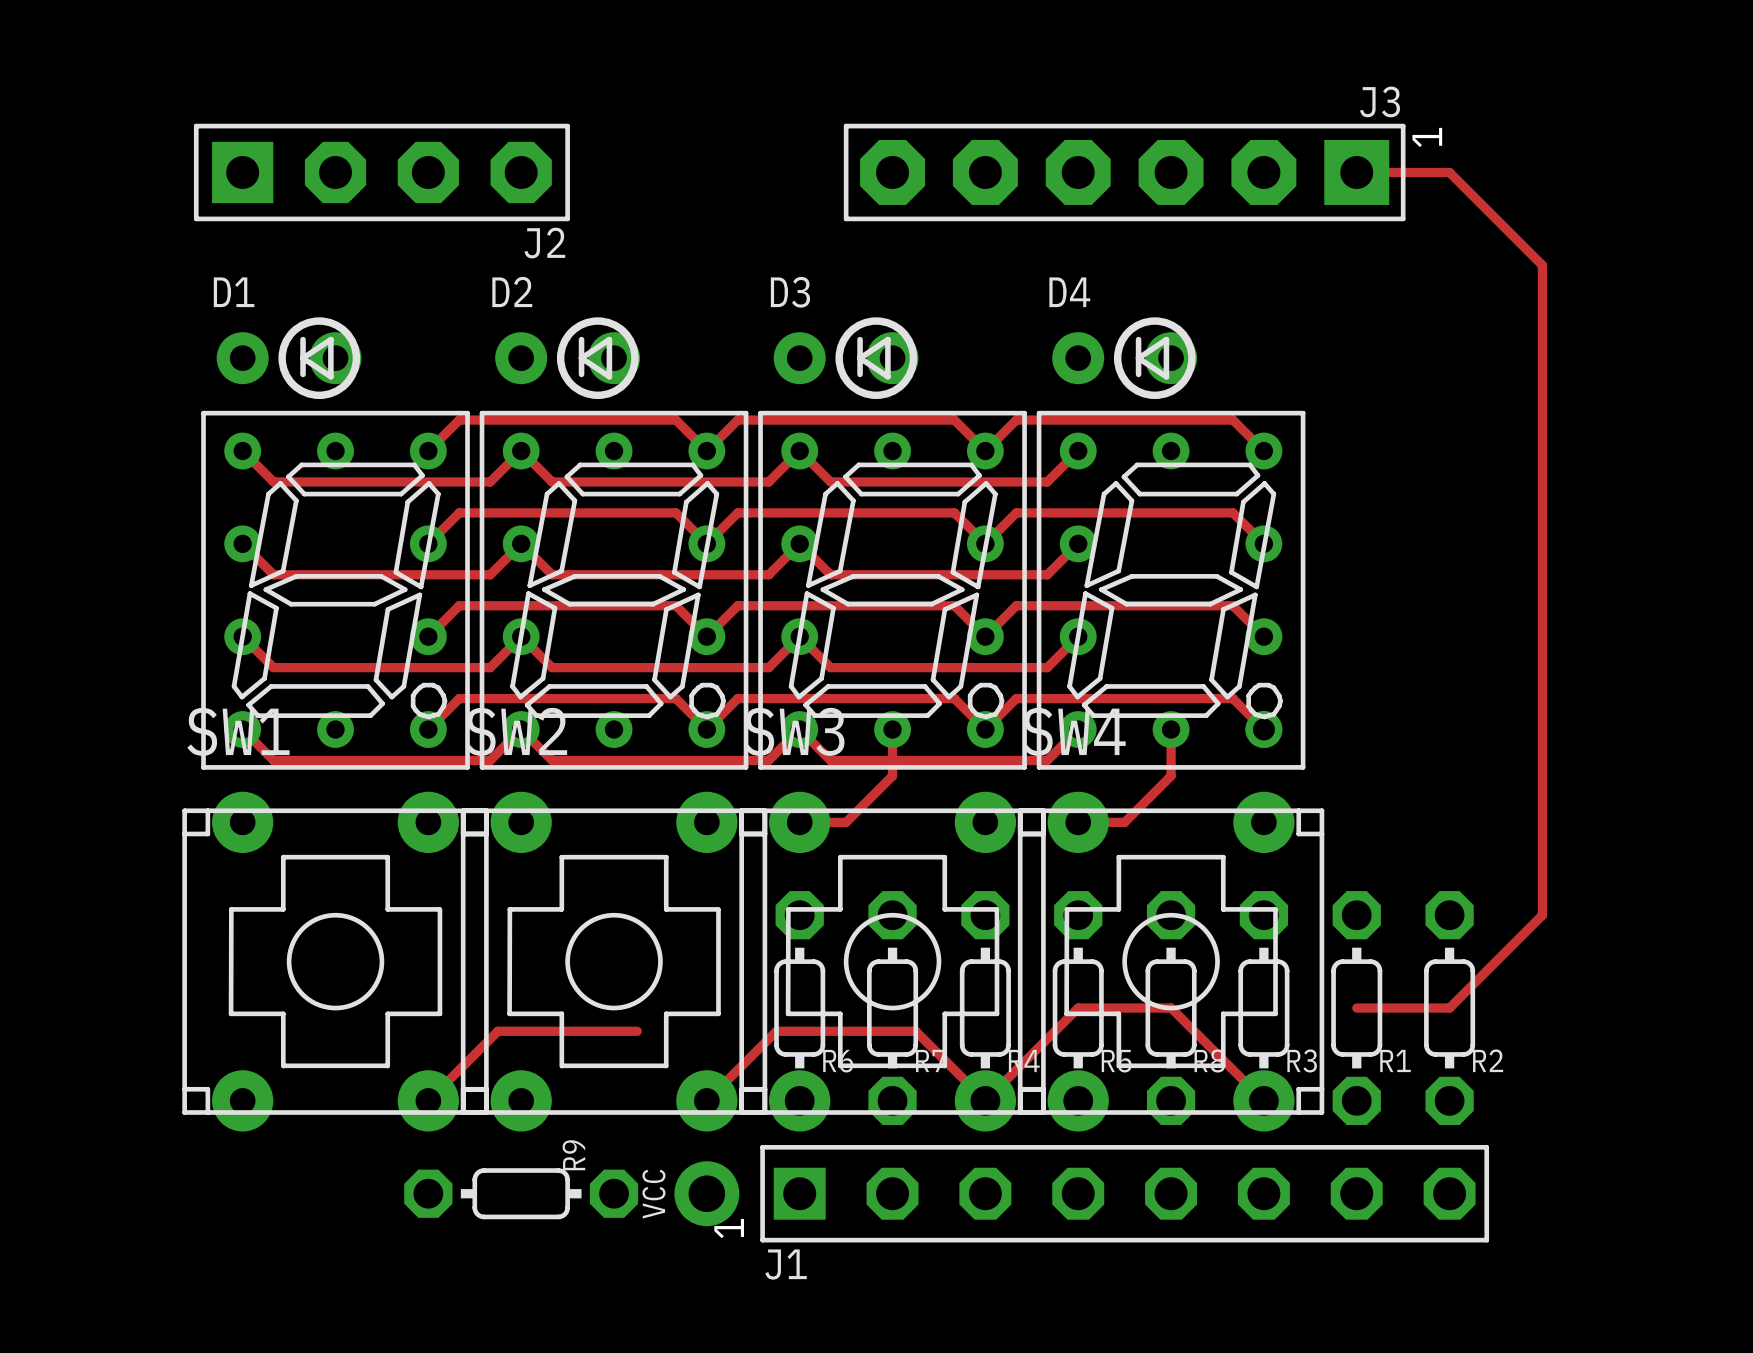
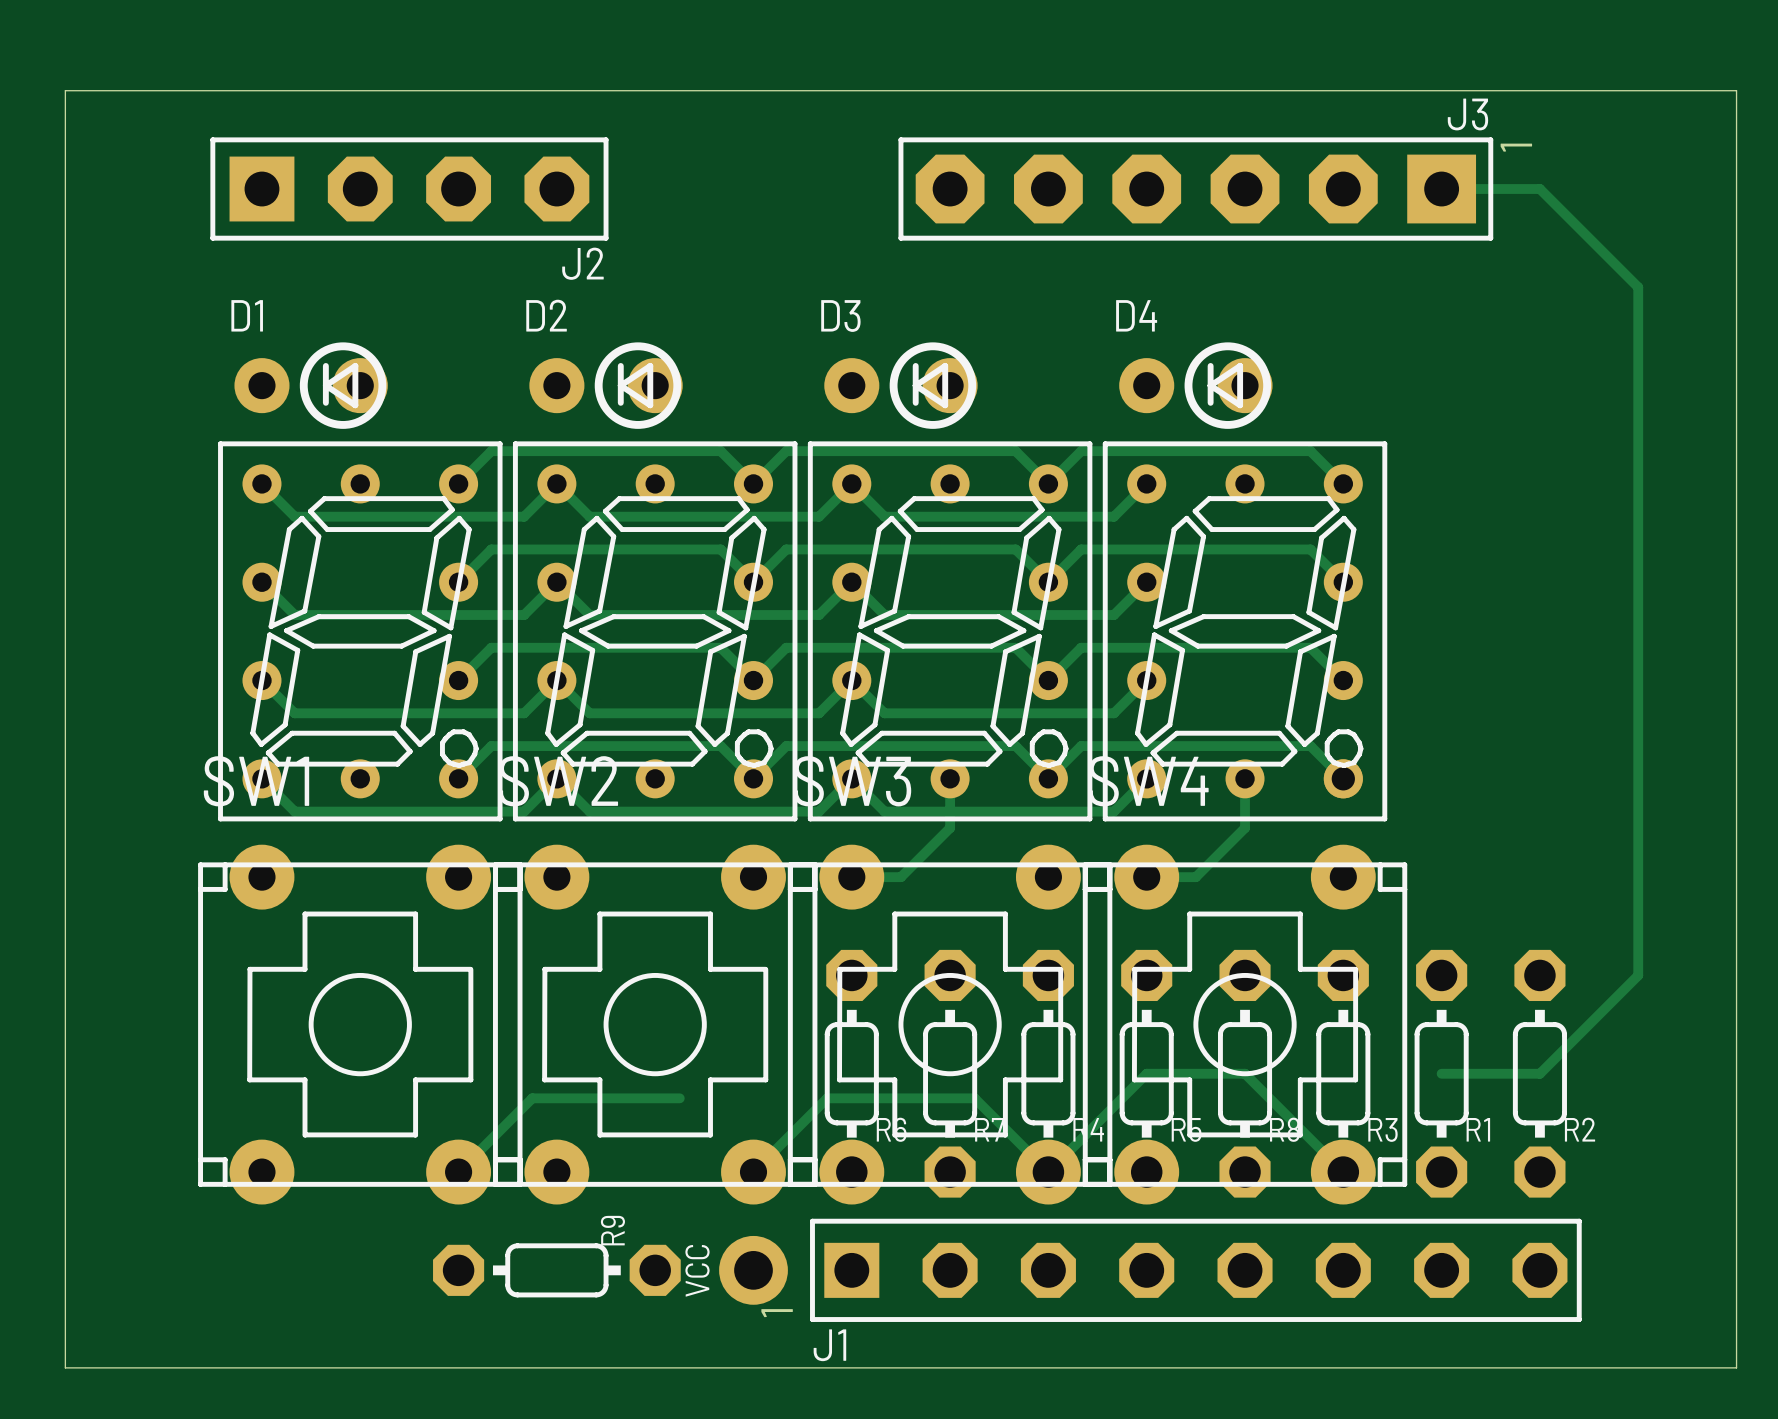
board edge: none -> (65, 90) (65, 1367) (1736, 1367) (1736, 90) (65, 90)

